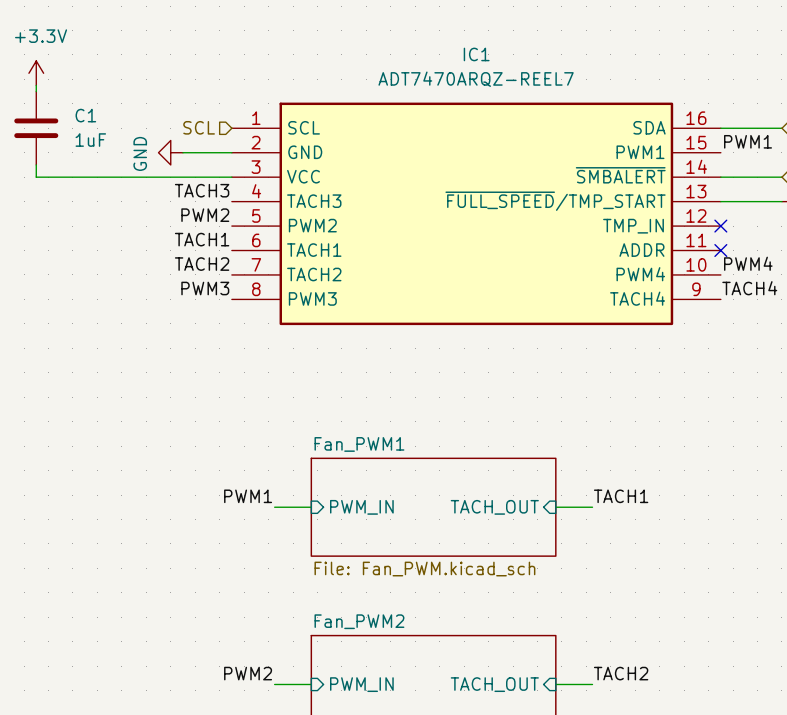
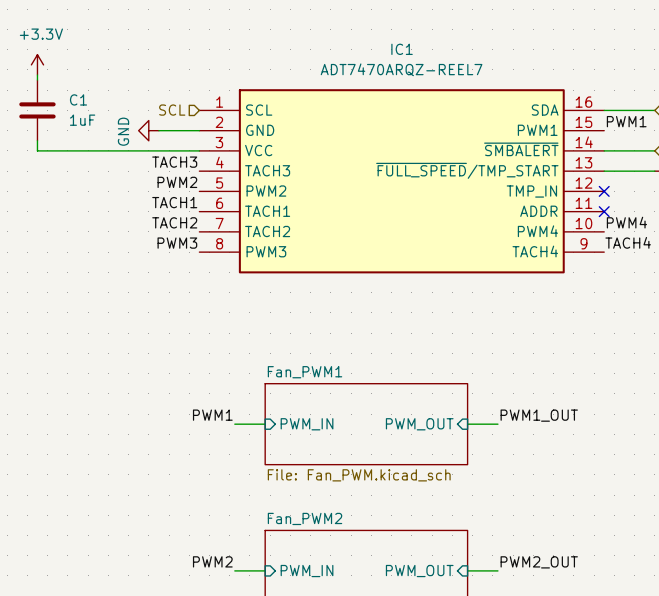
label: TACH1 (621, 496) -> PWM1_OUT (539, 415)
sheet pin: TACH_OUT (494, 507) -> PWM_OUT (419, 424)
label: TACH2 (621, 673) -> PWM2_OUT (539, 562)
sheet pin: TACH_OUT (494, 684) -> PWM_OUT (419, 571)

